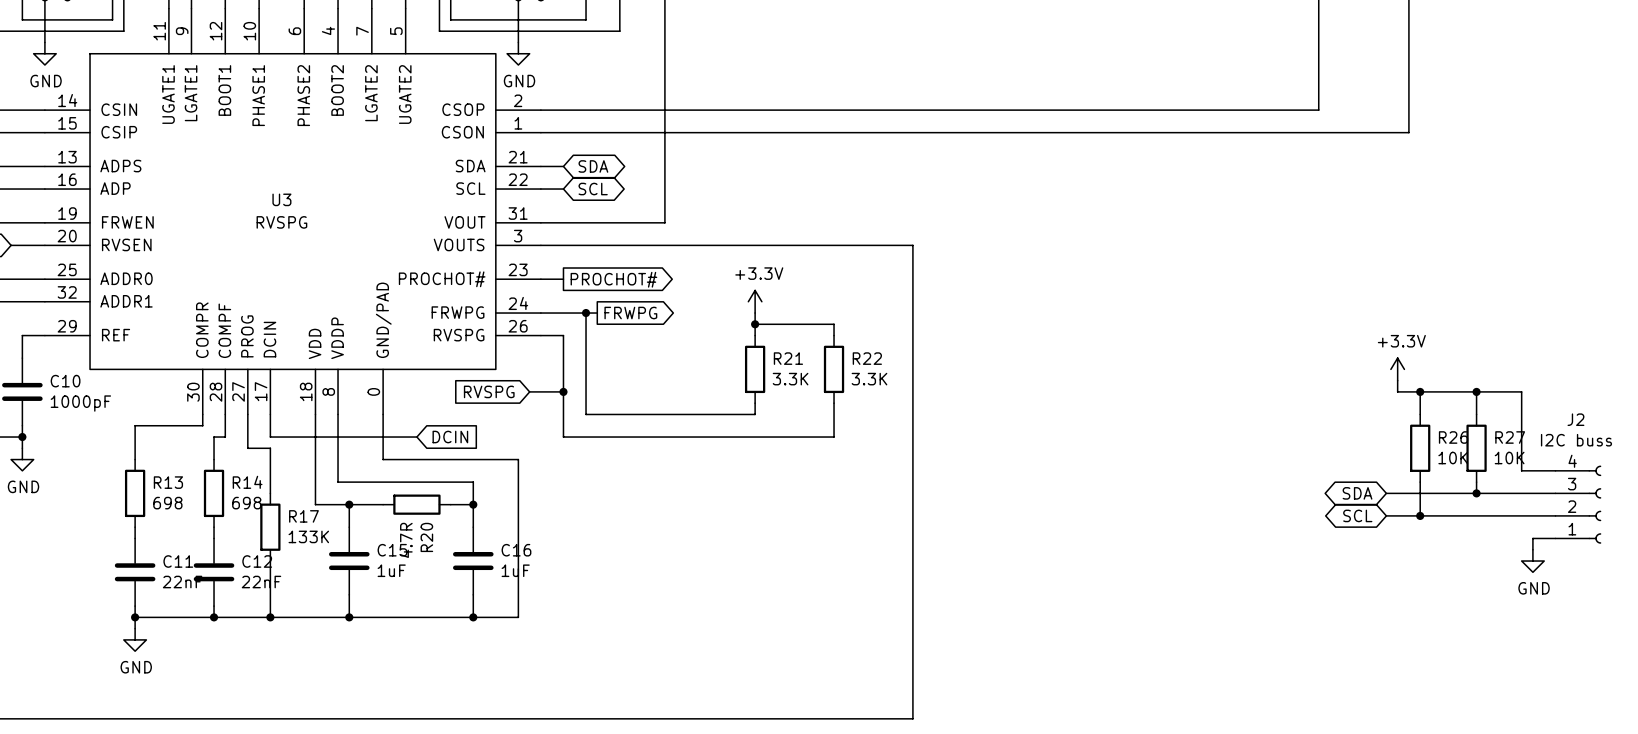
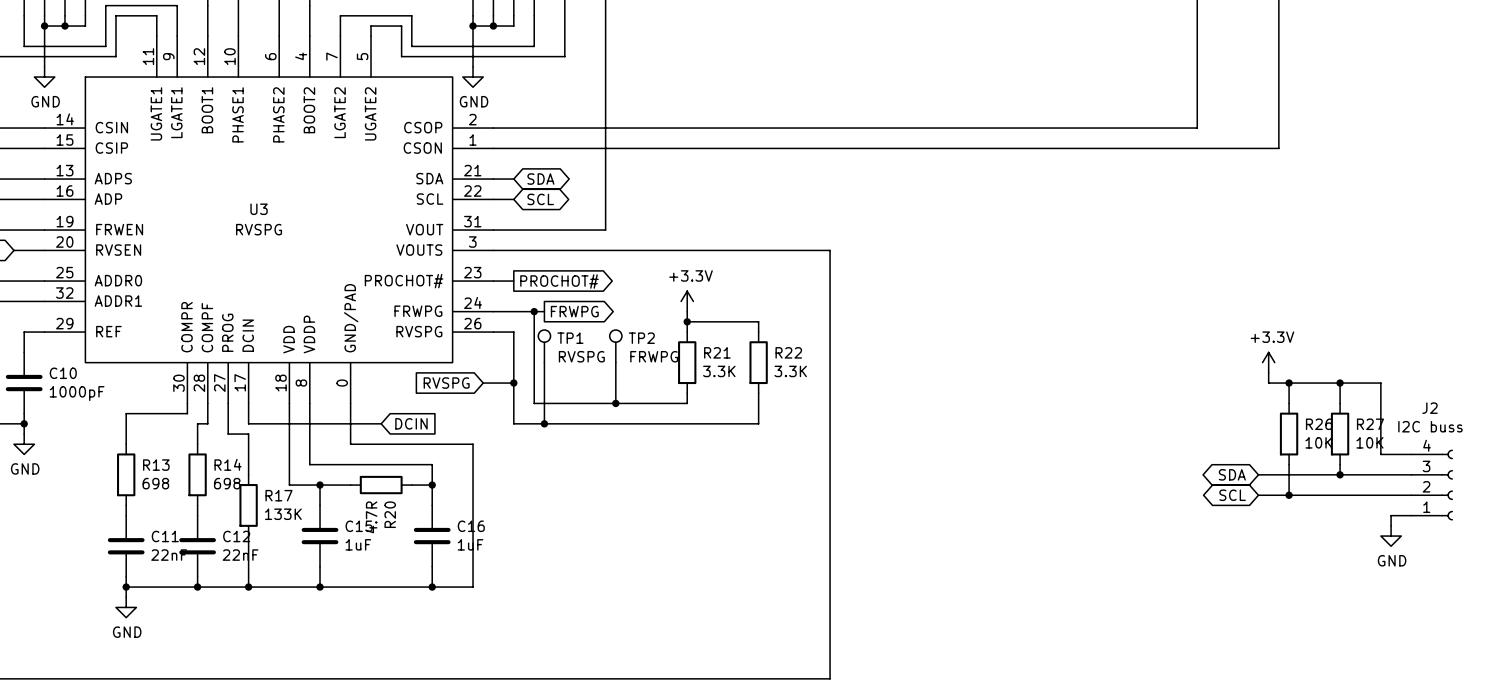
TP1: none -> RVSPG (544, 346)
TP2: none -> FRWPG (615, 346)
wire: none -> (544, 362) (544, 423)
wire: none -> (615, 362) (615, 403)
junction: none -> (615, 403)
junction: none -> (544, 423)

